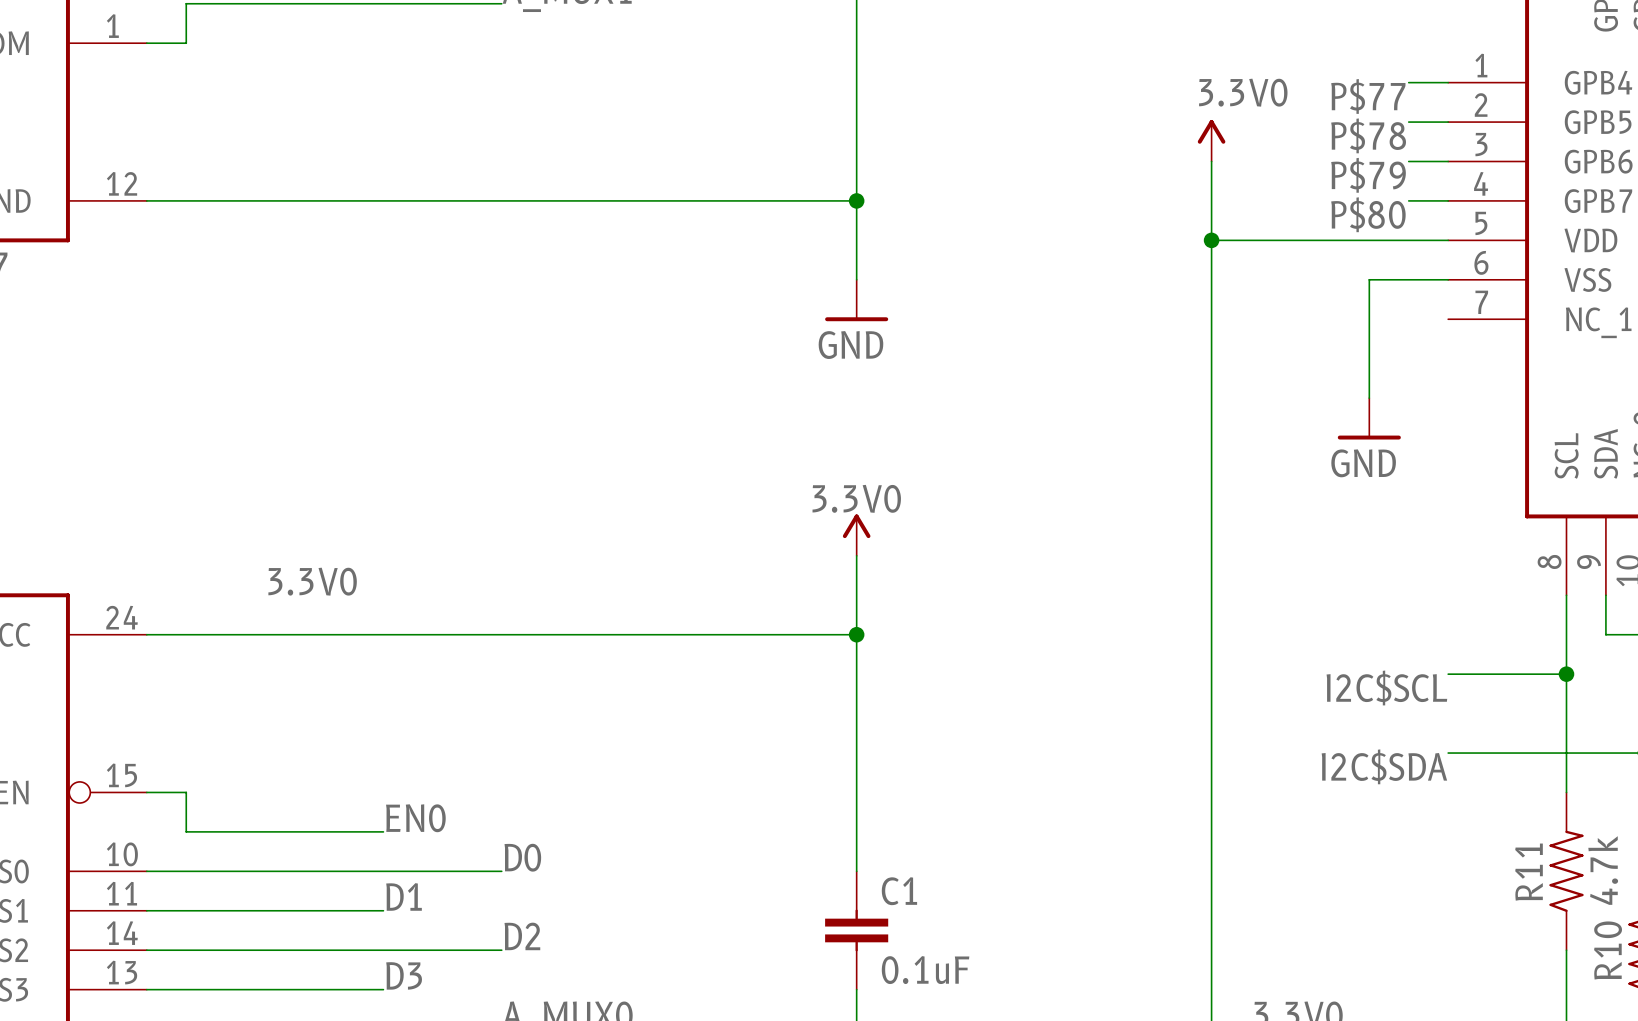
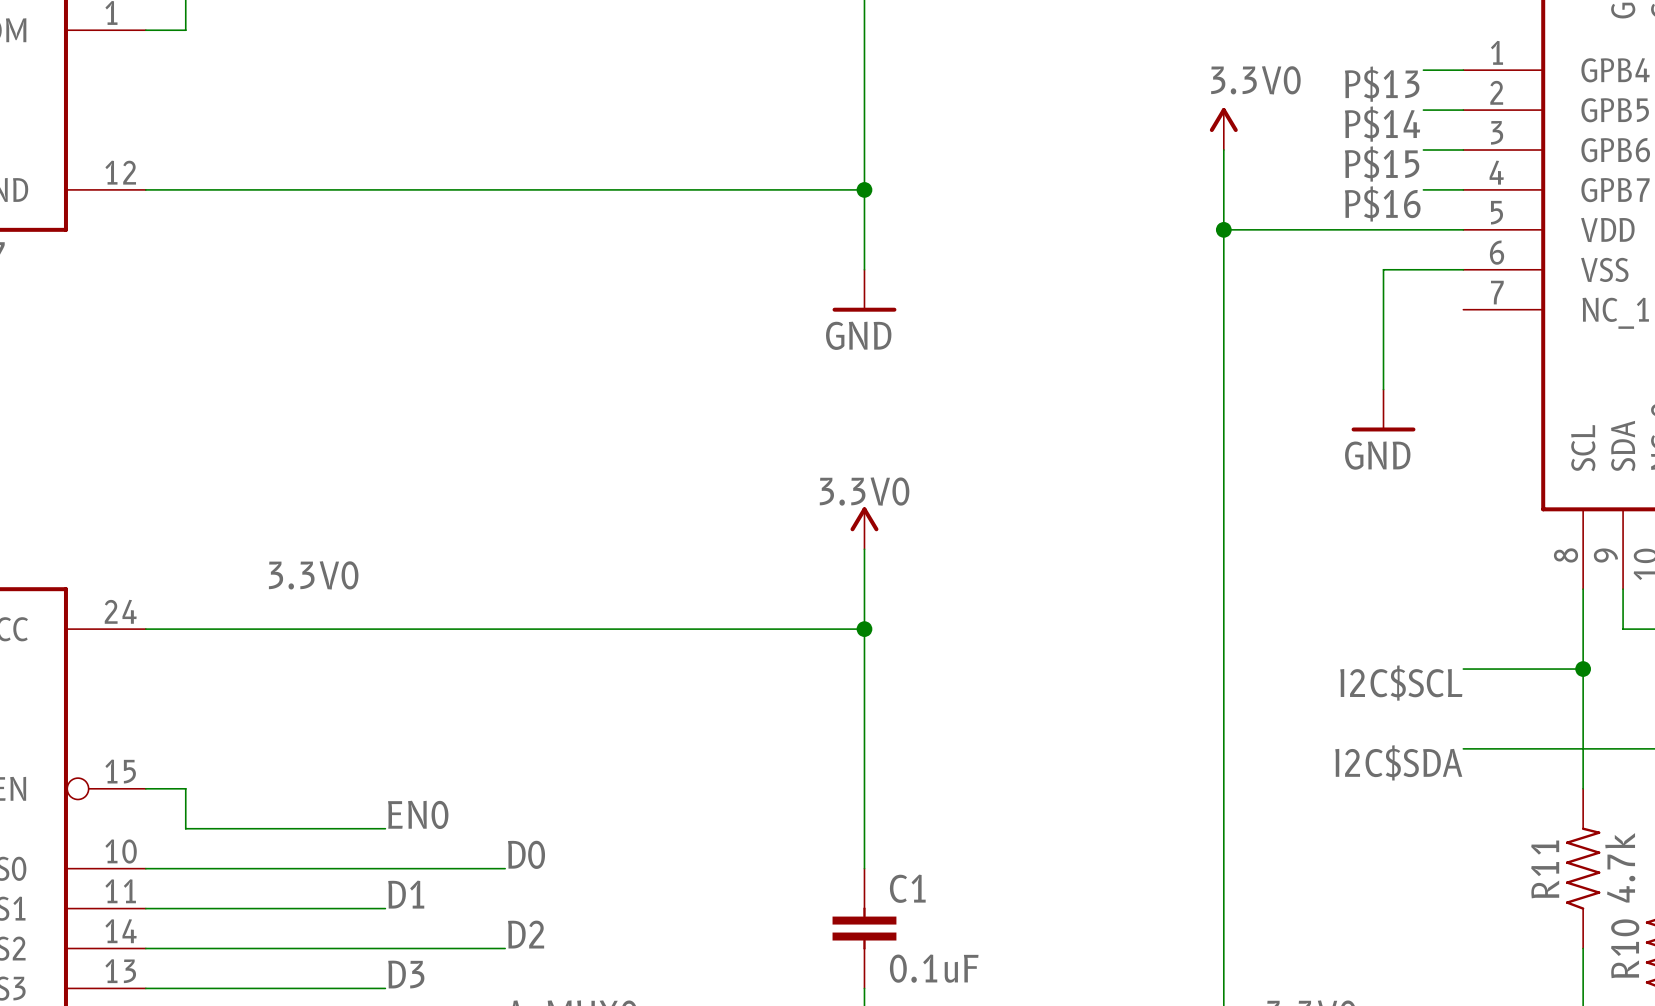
label: P$77 (1368, 96) -> P$13 (1382, 84)
label: P$78 (1368, 135) -> P$14 (1382, 124)
label: P$79 (1368, 175) -> P$15 (1382, 163)
label: P$80 (1368, 214) -> P$16 (1382, 203)

